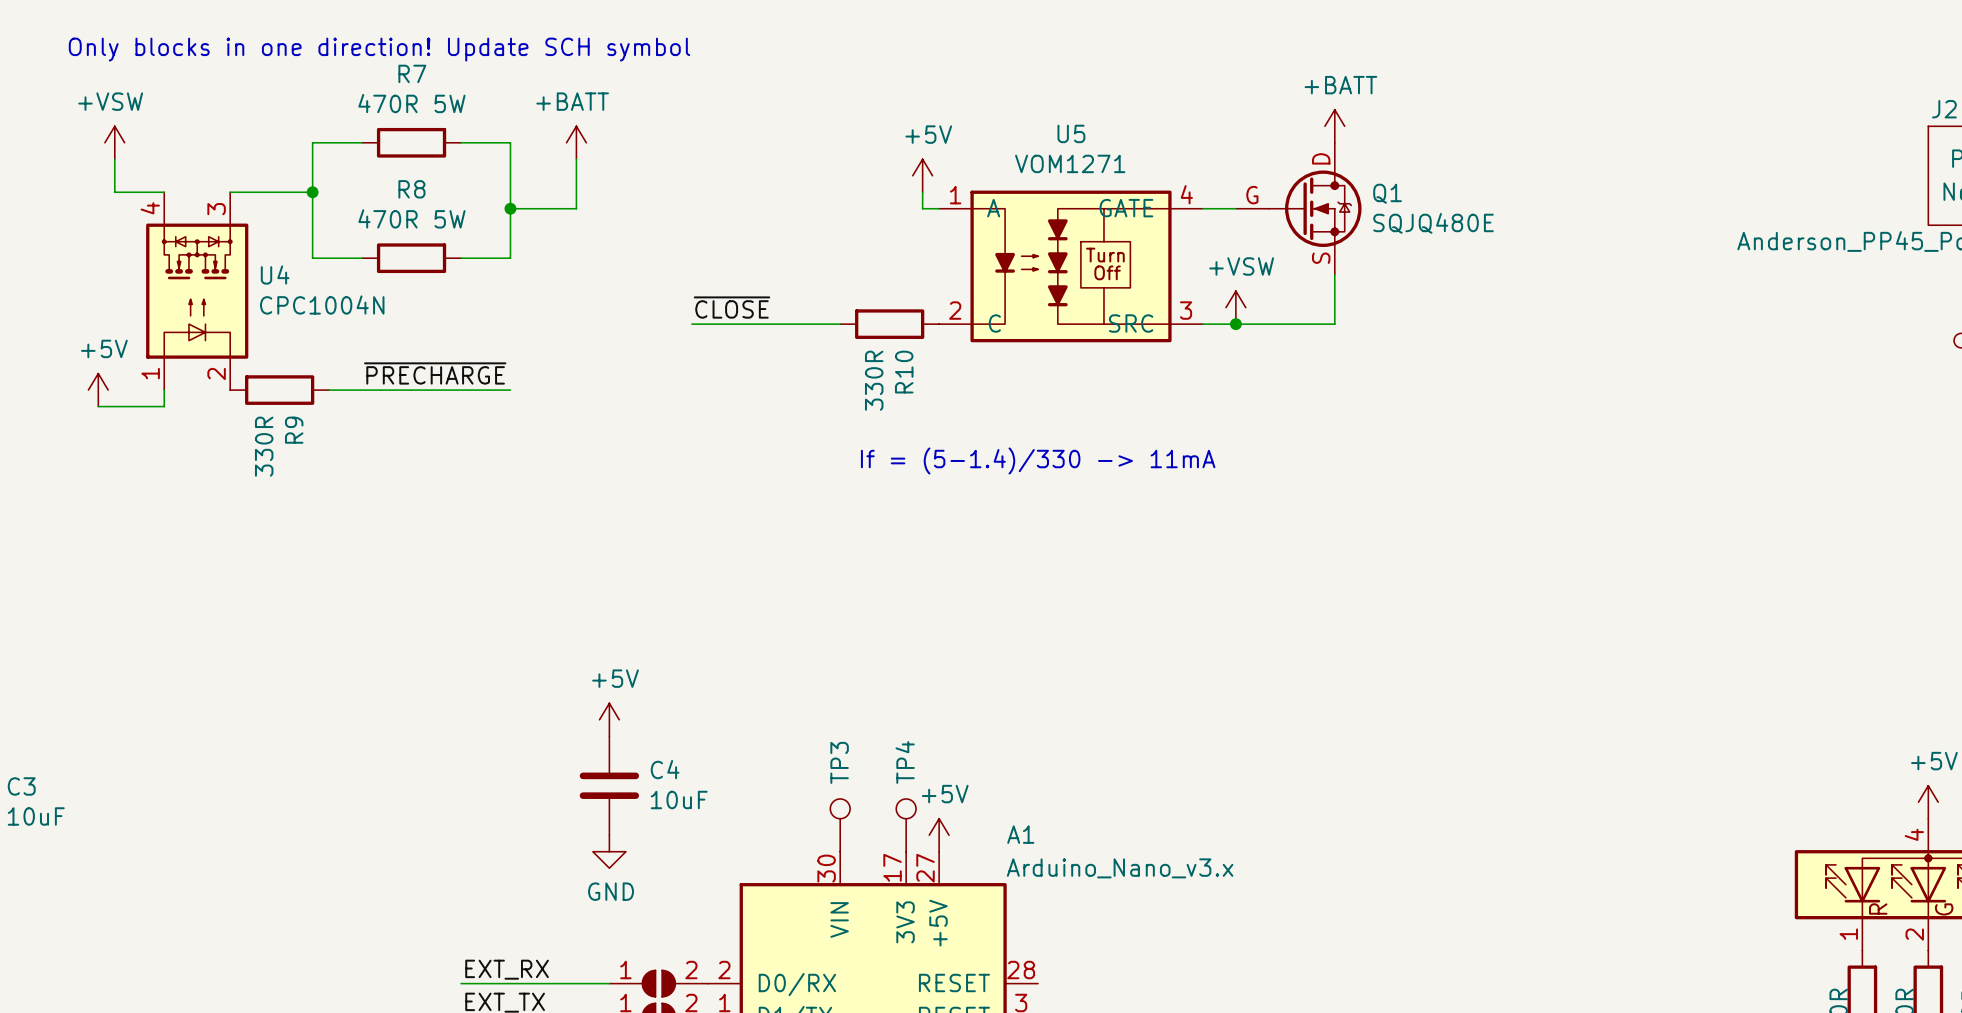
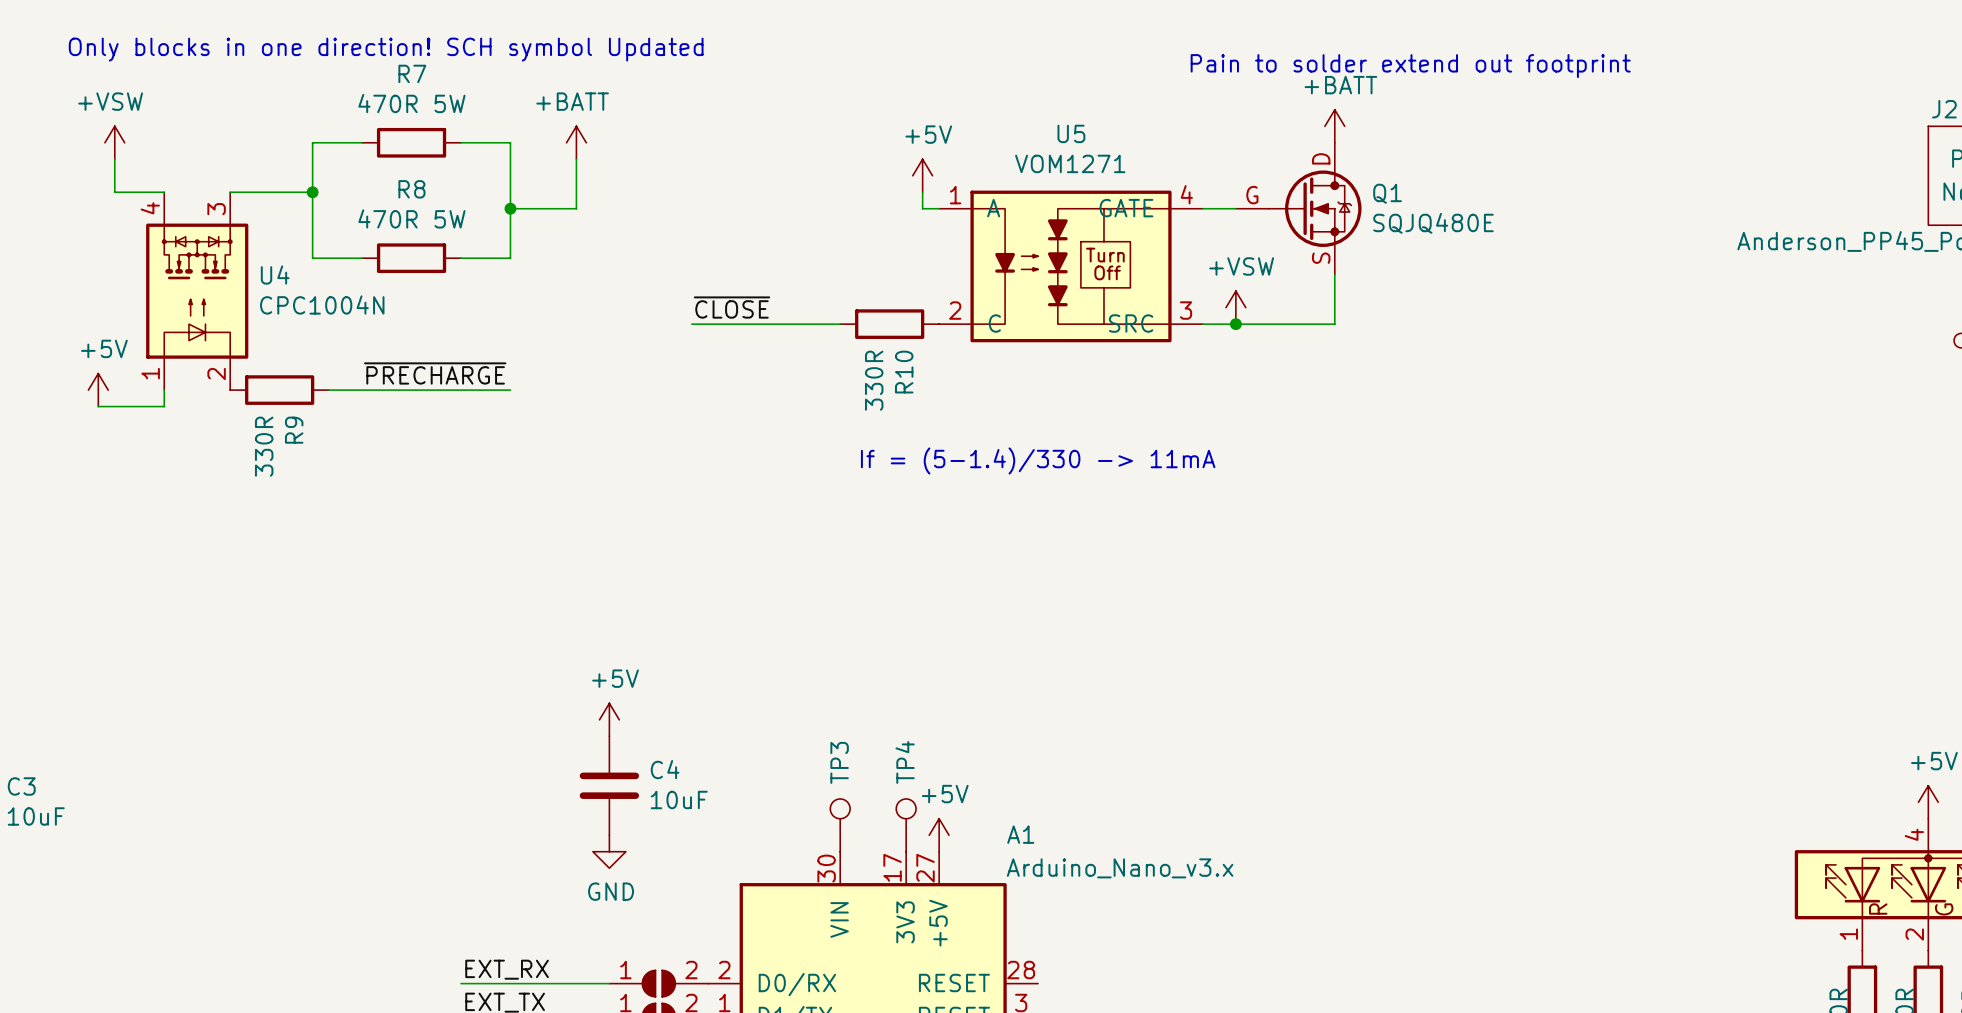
text: Only blocks in one direction! Update SCH symbol (379, 49) -> Only blocks in one direction! SCH symbol Updated (386, 49)
text: none -> Pain to solder extend out footprint (1410, 66)

